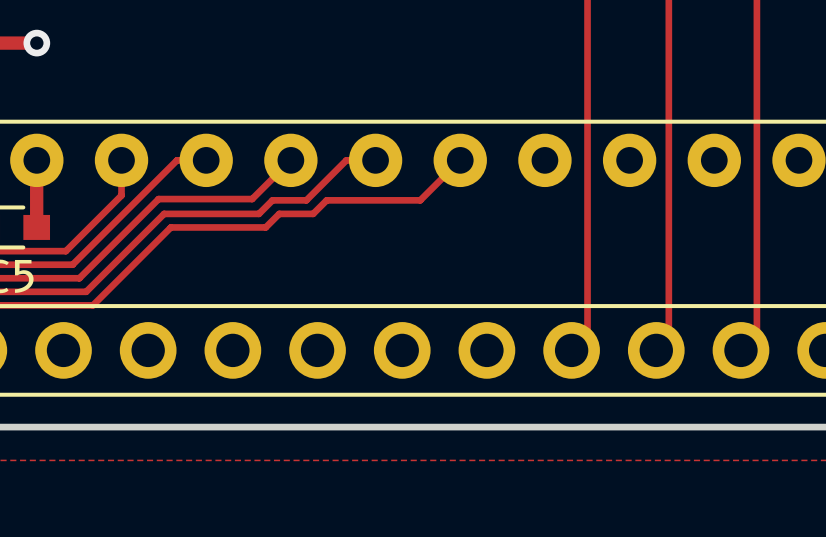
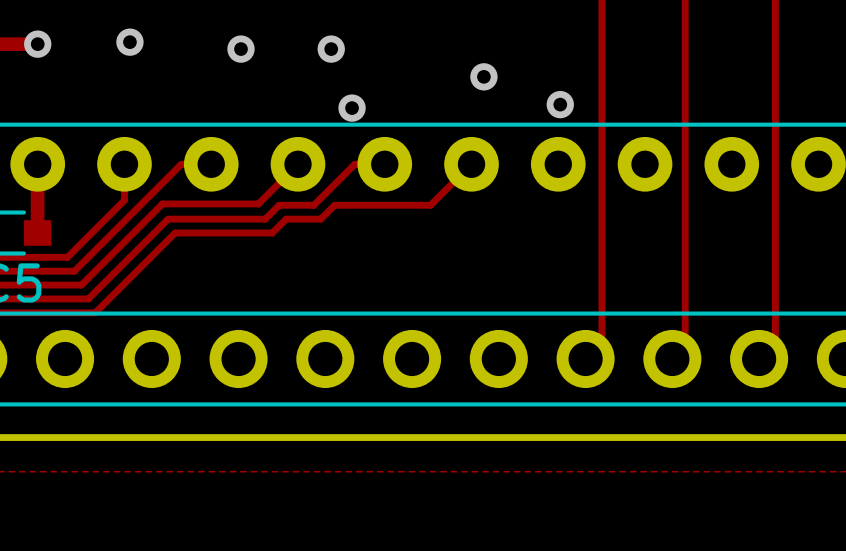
via: none -> (129, 42)
via: none -> (241, 49)
via: none -> (331, 49)
via: none -> (483, 76)
via: none -> (560, 104)
via: none -> (352, 108)

